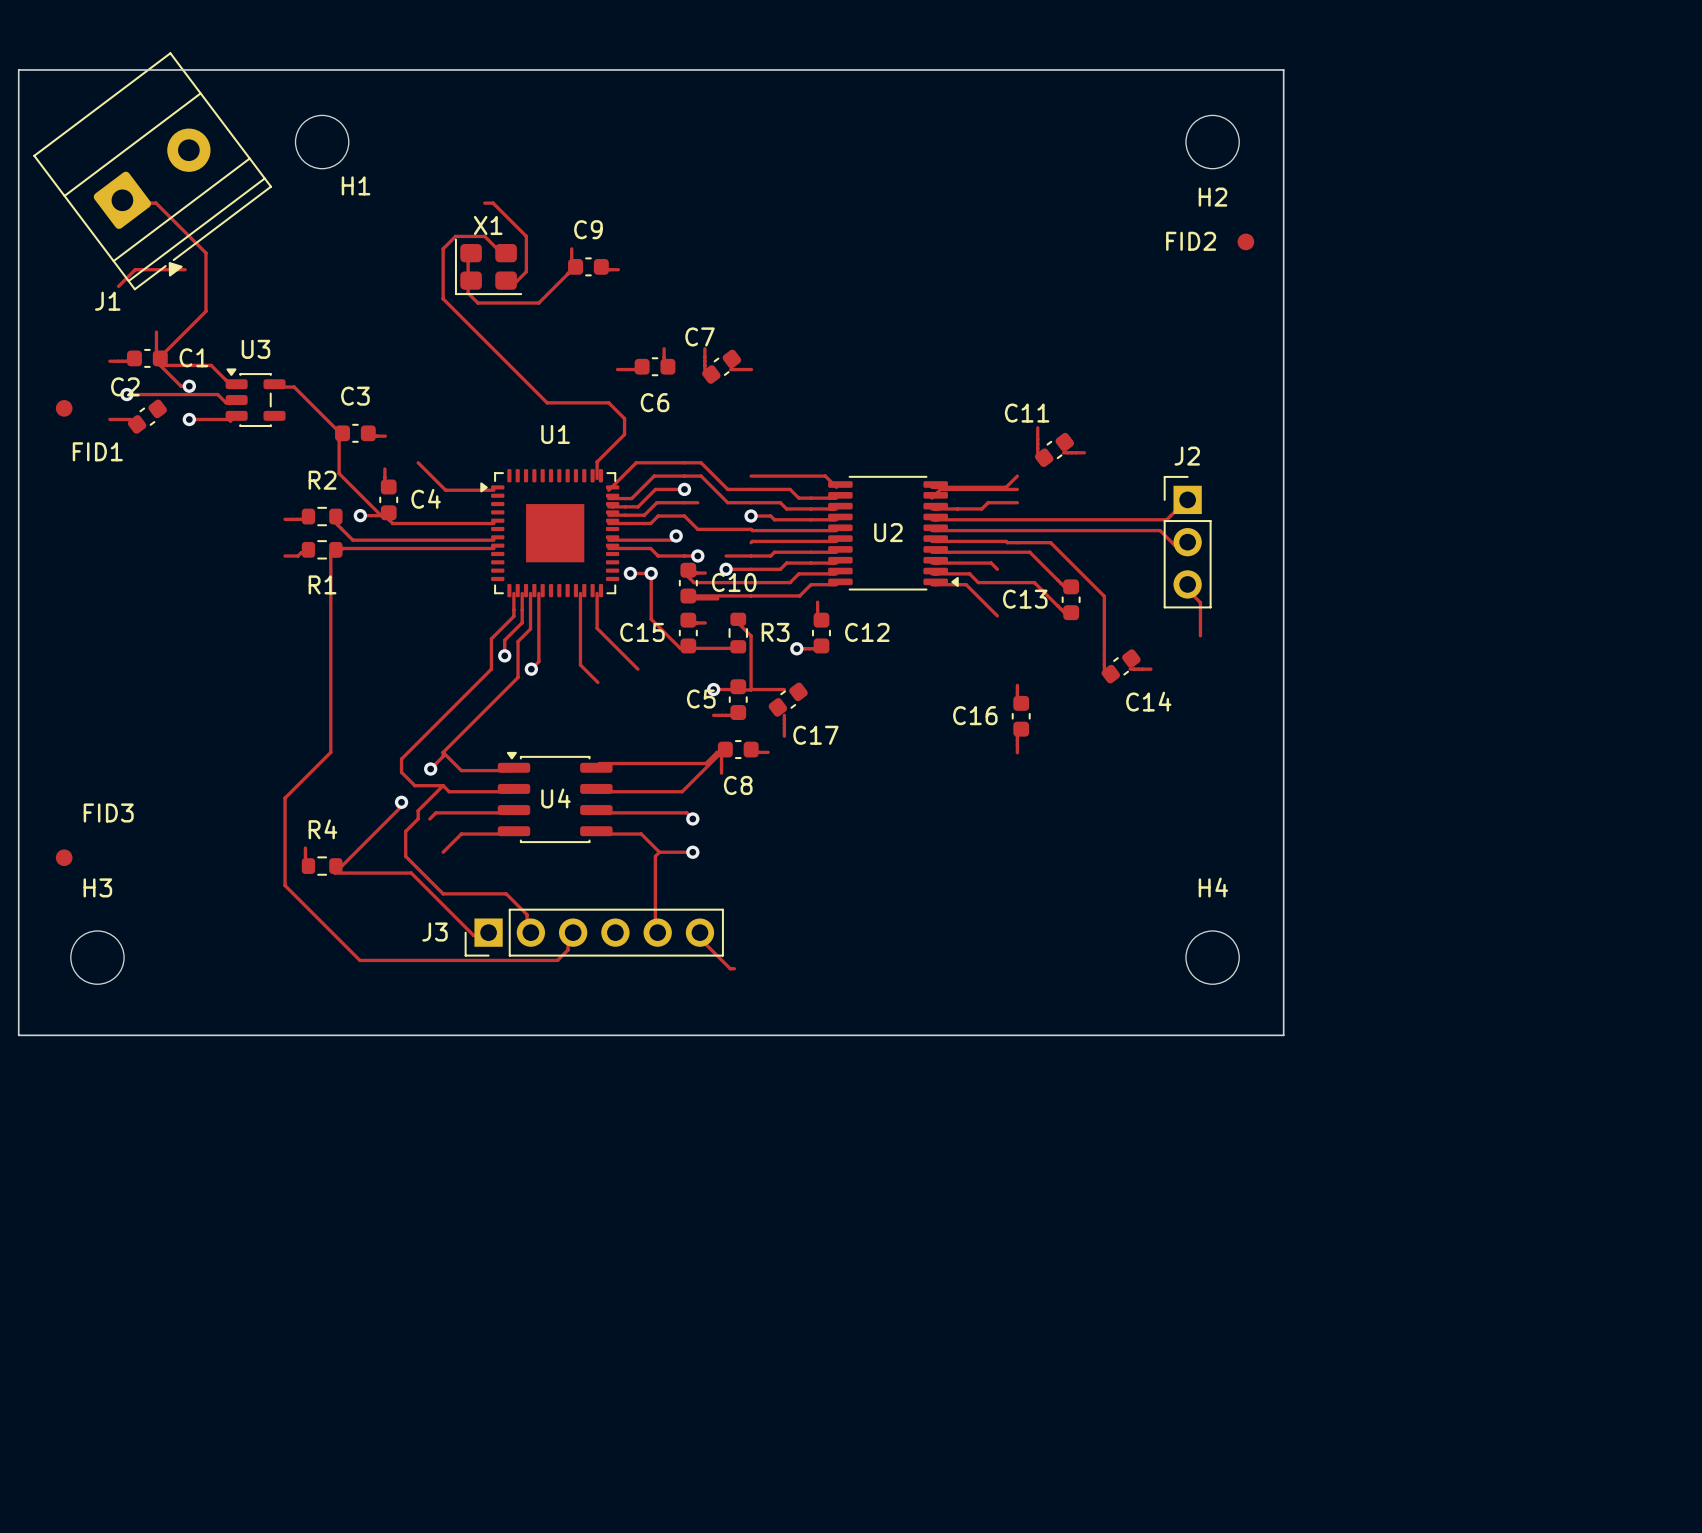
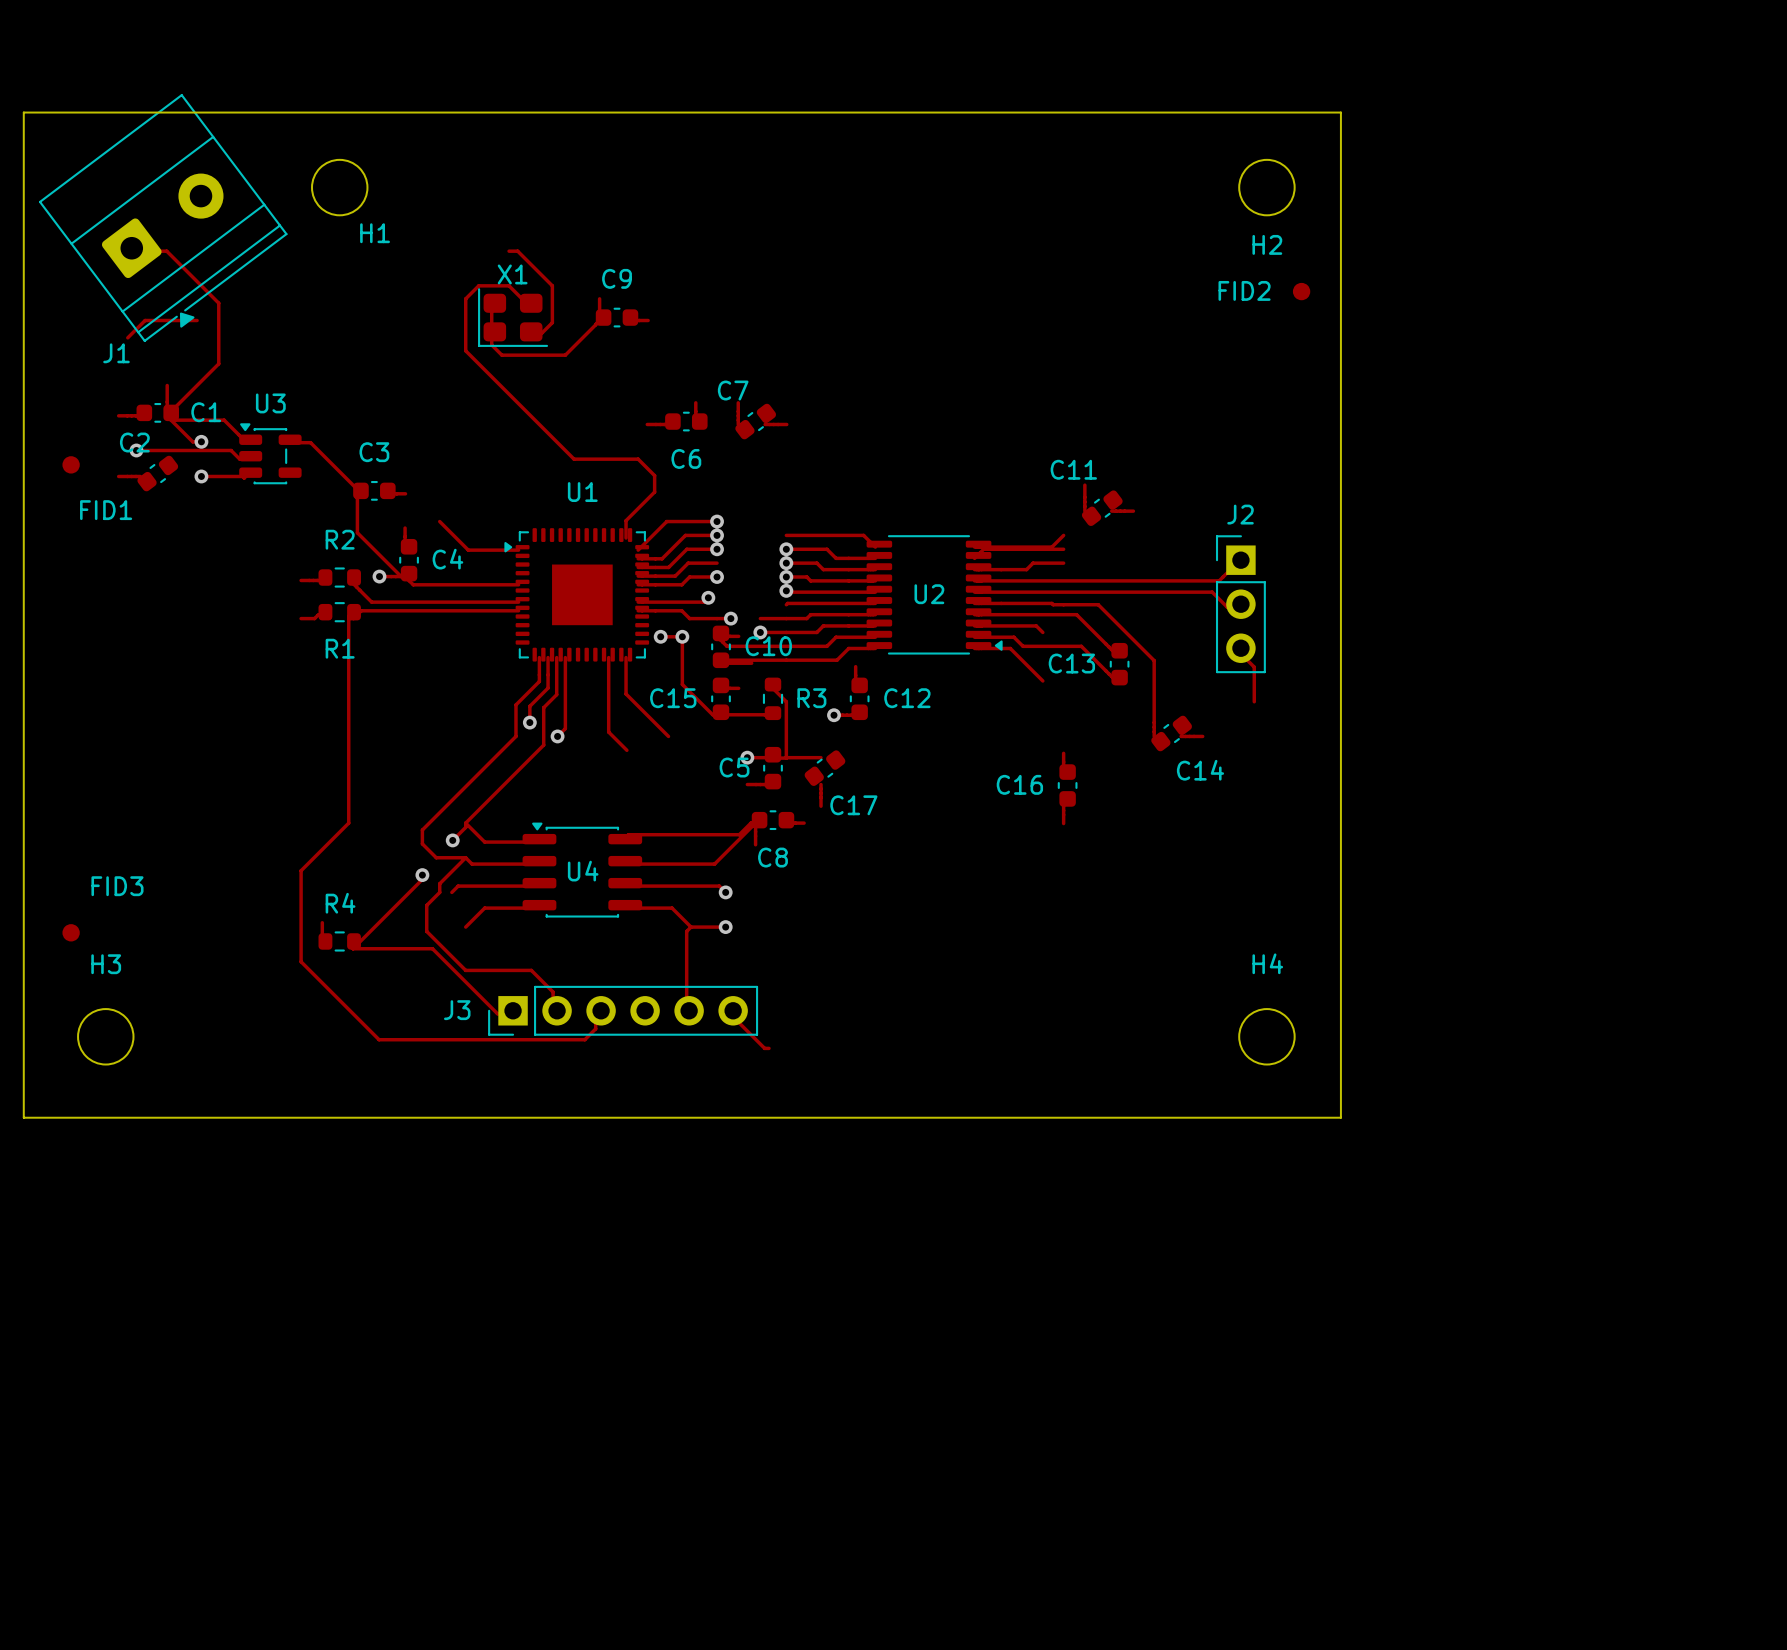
track: (684, 462) (701, 462) (727, 489) (751, 489) -> none
via: none -> (717, 521)
track: (684, 476) (701, 476) (727, 502) (751, 502) -> none
via: none -> (717, 535)
via: none -> (786, 549)
track: (684, 502) (697, 502) -> none
via: none -> (786, 563)
track: (684, 516) (697, 529) (751, 529) -> none
via: none -> (717, 577)
via: none -> (786, 590)

